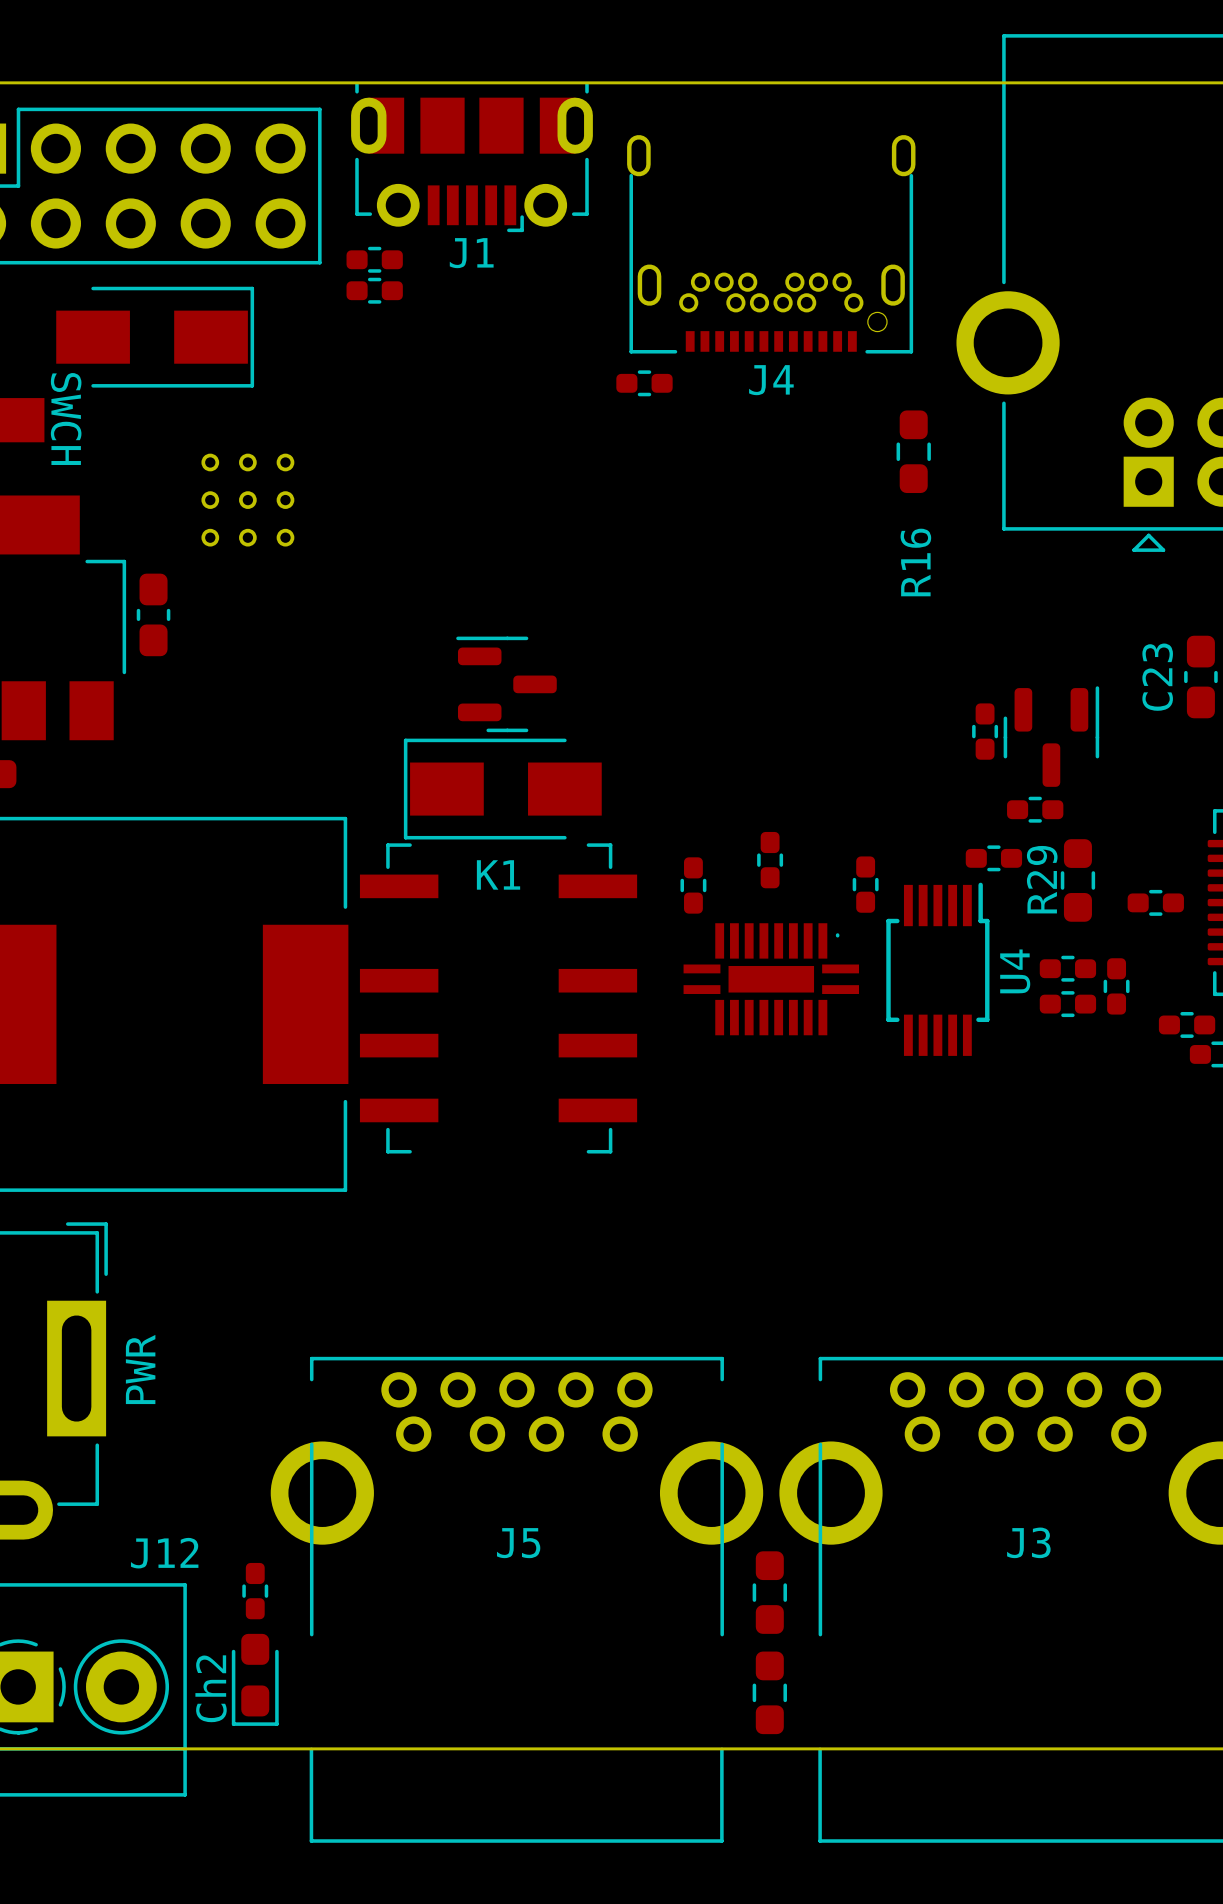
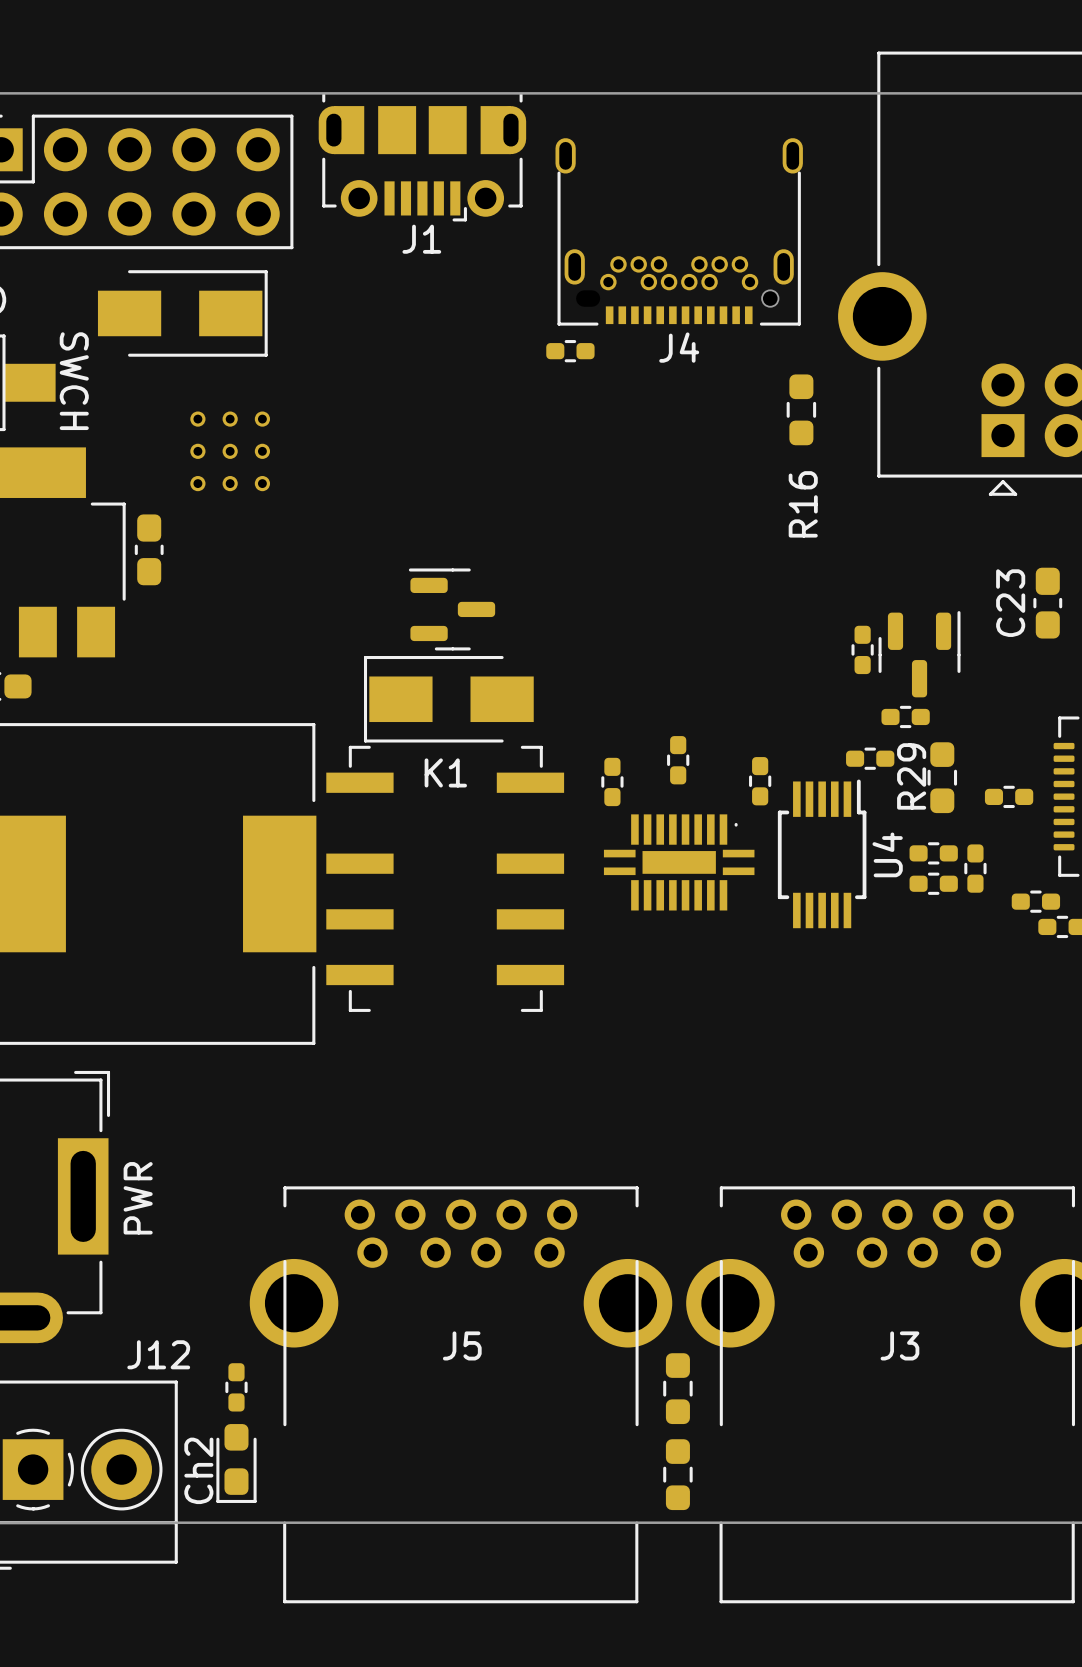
part: (374, 259) -> none
part: (374, 290) -> none
part position: (155, 337) -> (182, 313)

